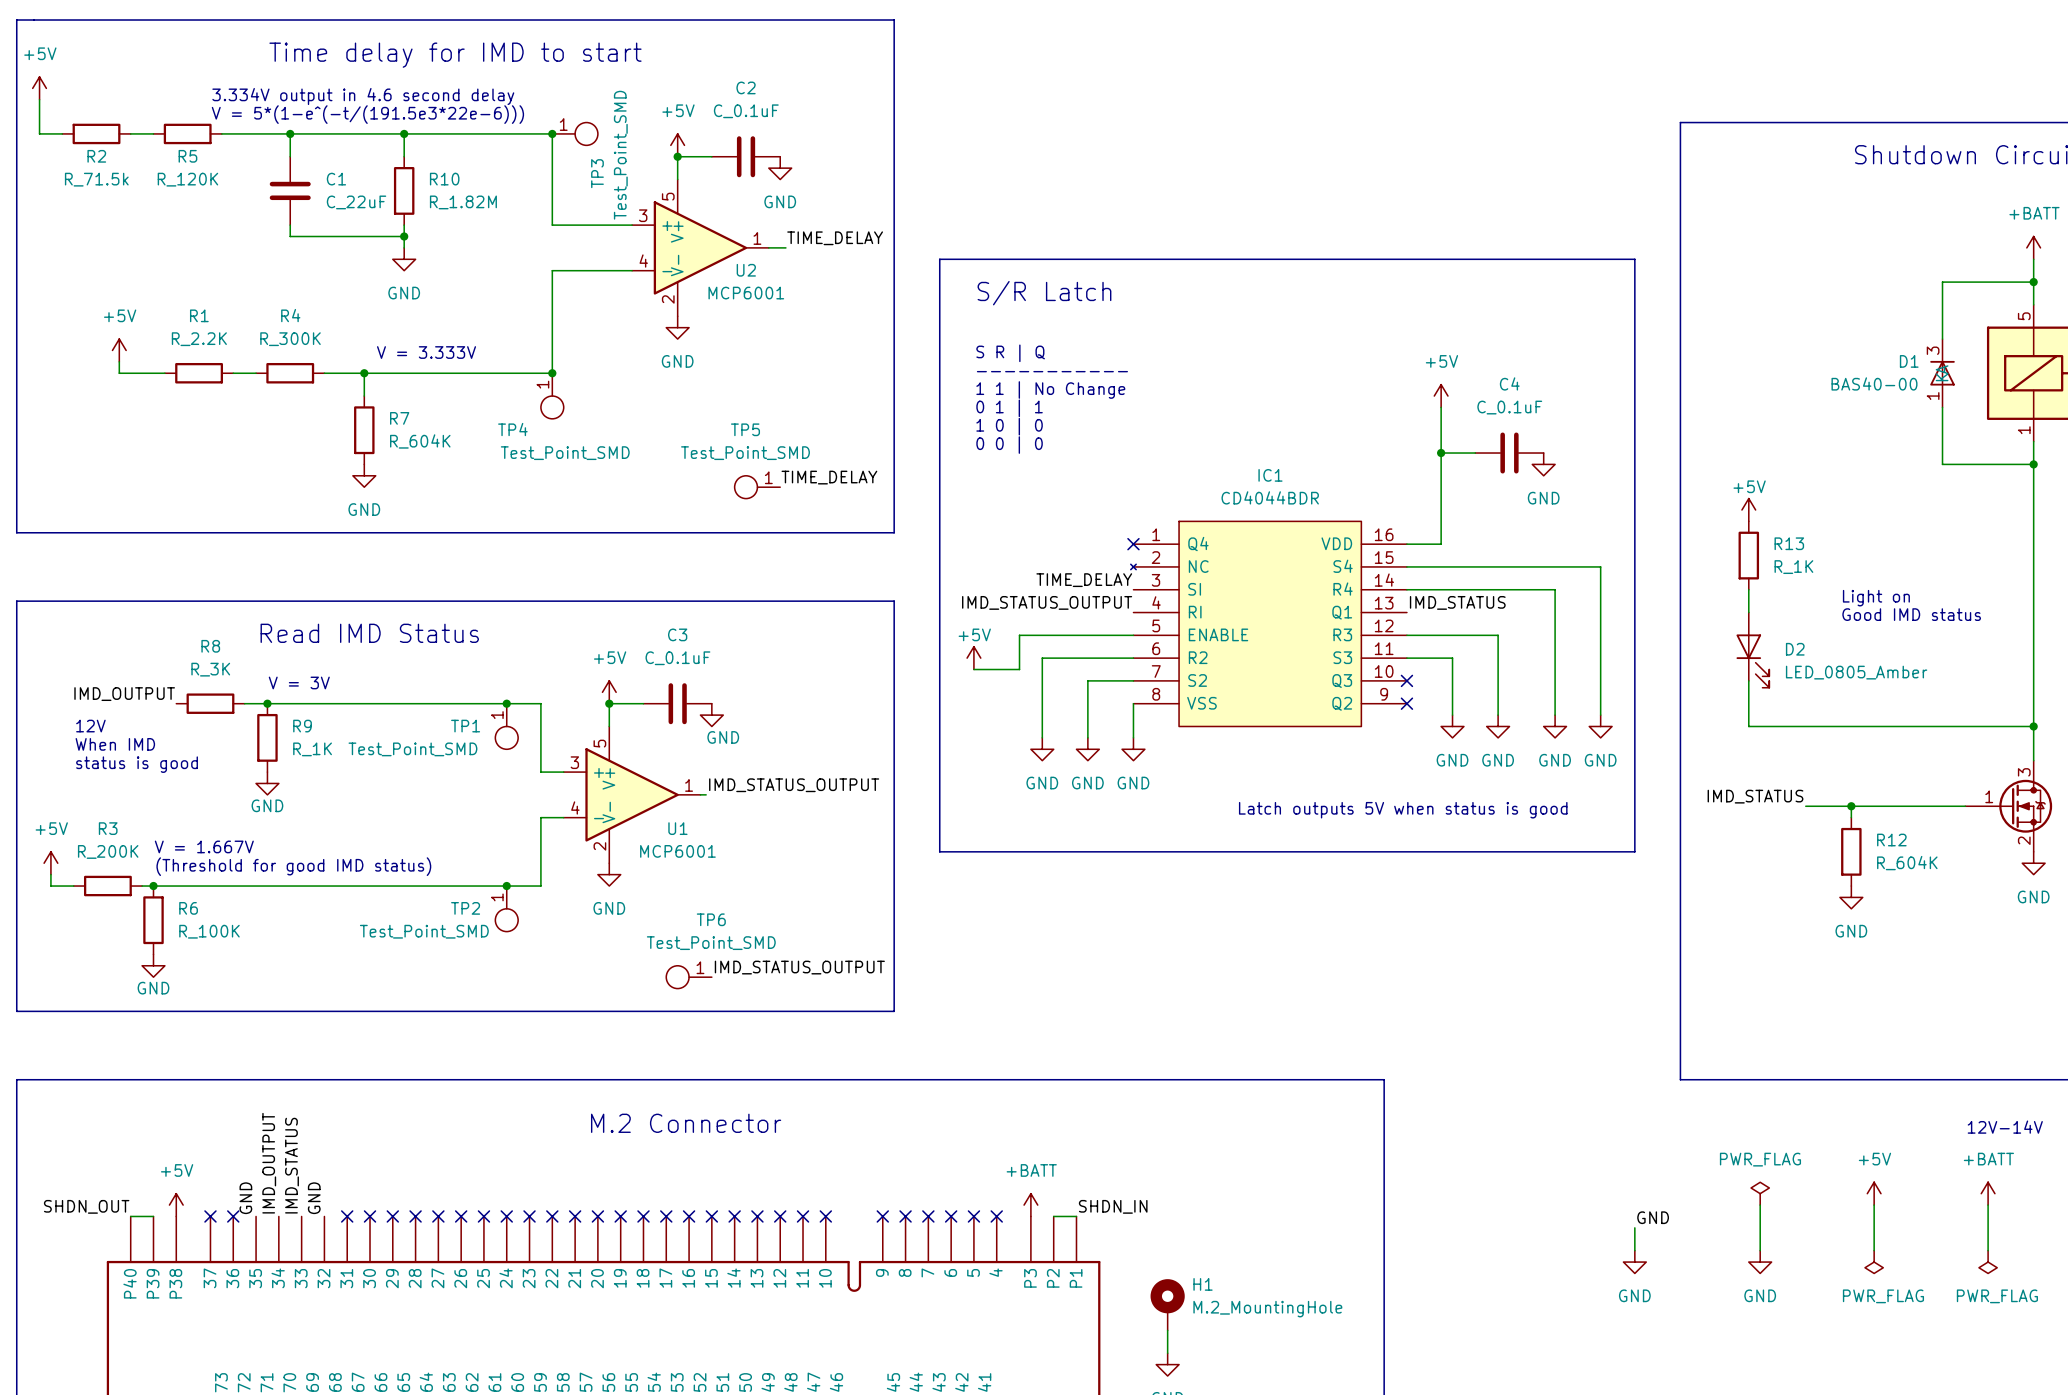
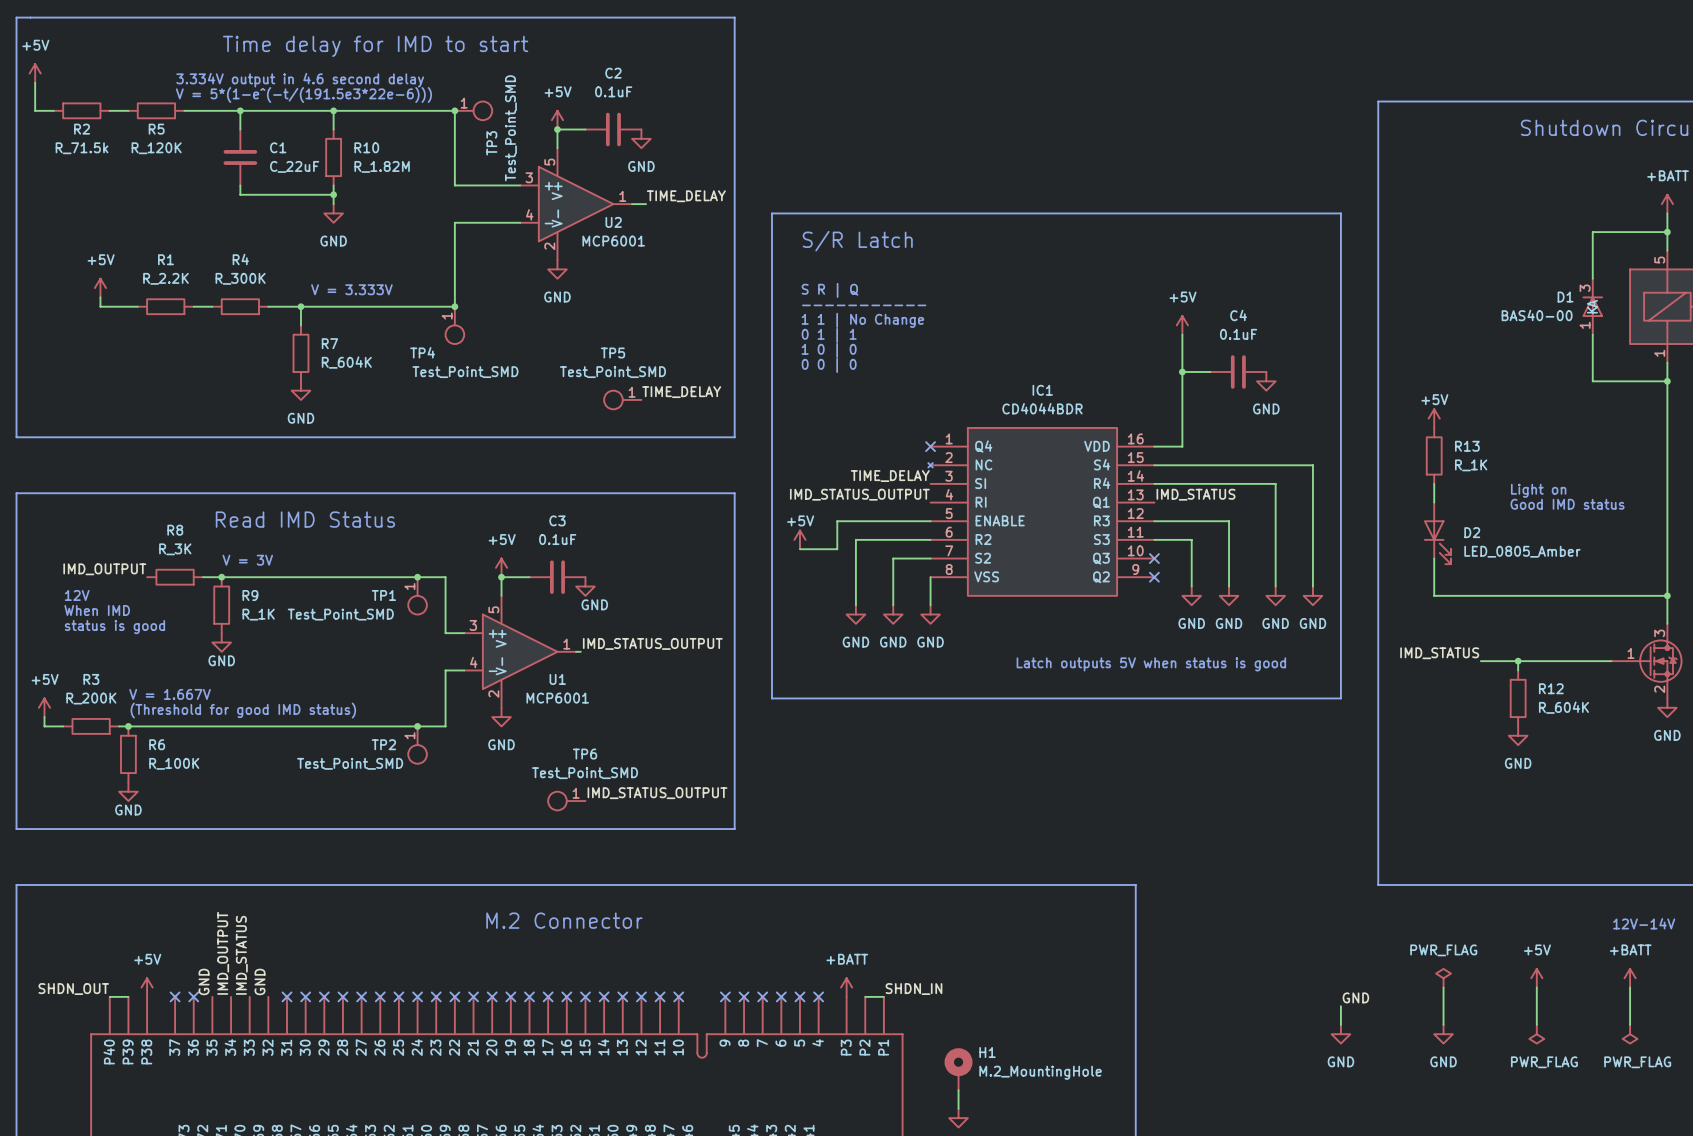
C2 value: C_0.1uF (746, 111) -> 0.1uF (613, 91)
C4 value: C_0.1uF (1509, 407) -> 0.1uF (1238, 334)
C3 value: C_0.1uF (677, 658) -> 0.1uF (557, 539)

